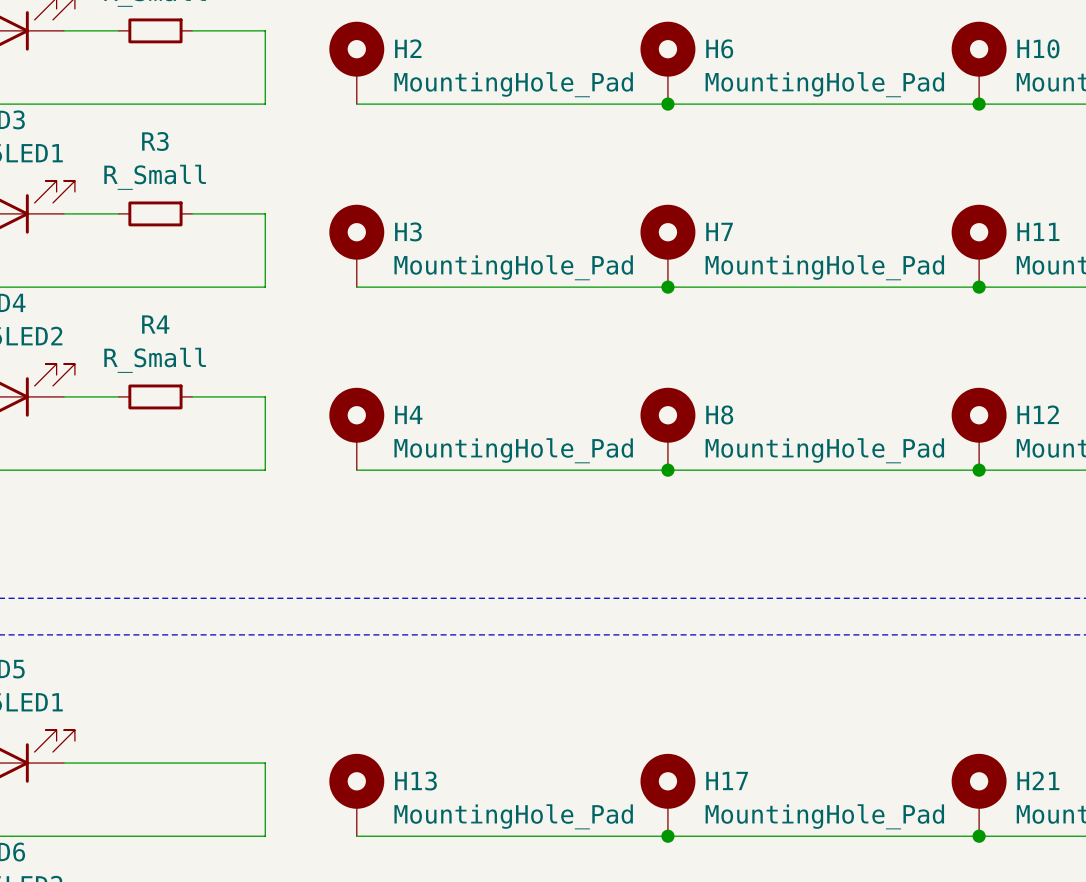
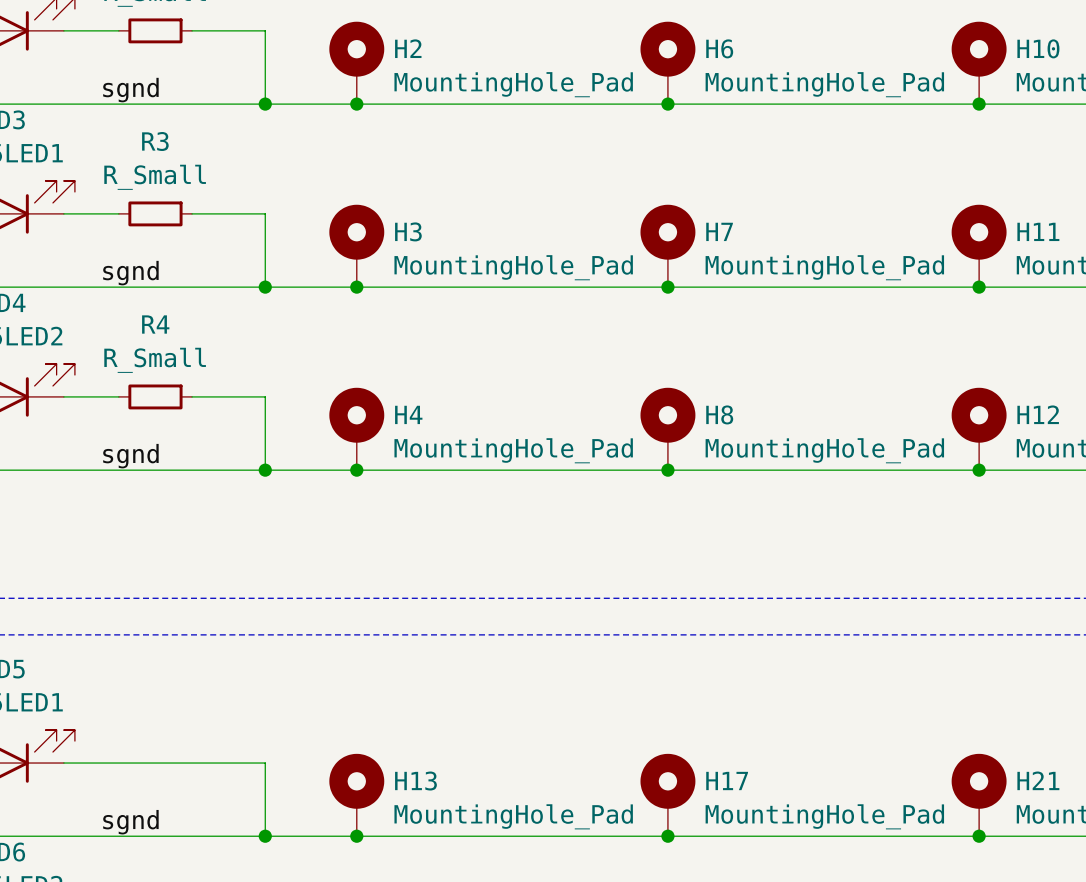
label: none -> sgnd (130, 90)
wire: none -> (265, 104) (356, 104)
junction: none -> (265, 104)
junction: none -> (356, 104)
label: none -> sgnd (130, 273)
wire: none -> (265, 287) (356, 287)
junction: none -> (265, 287)
junction: none -> (356, 287)
label: none -> sgnd (130, 456)
wire: none -> (265, 470) (356, 470)
junction: none -> (265, 470)
junction: none -> (356, 470)
label: none -> sgnd (130, 822)
wire: none -> (265, 836) (356, 836)
junction: none -> (265, 836)
junction: none -> (356, 836)

